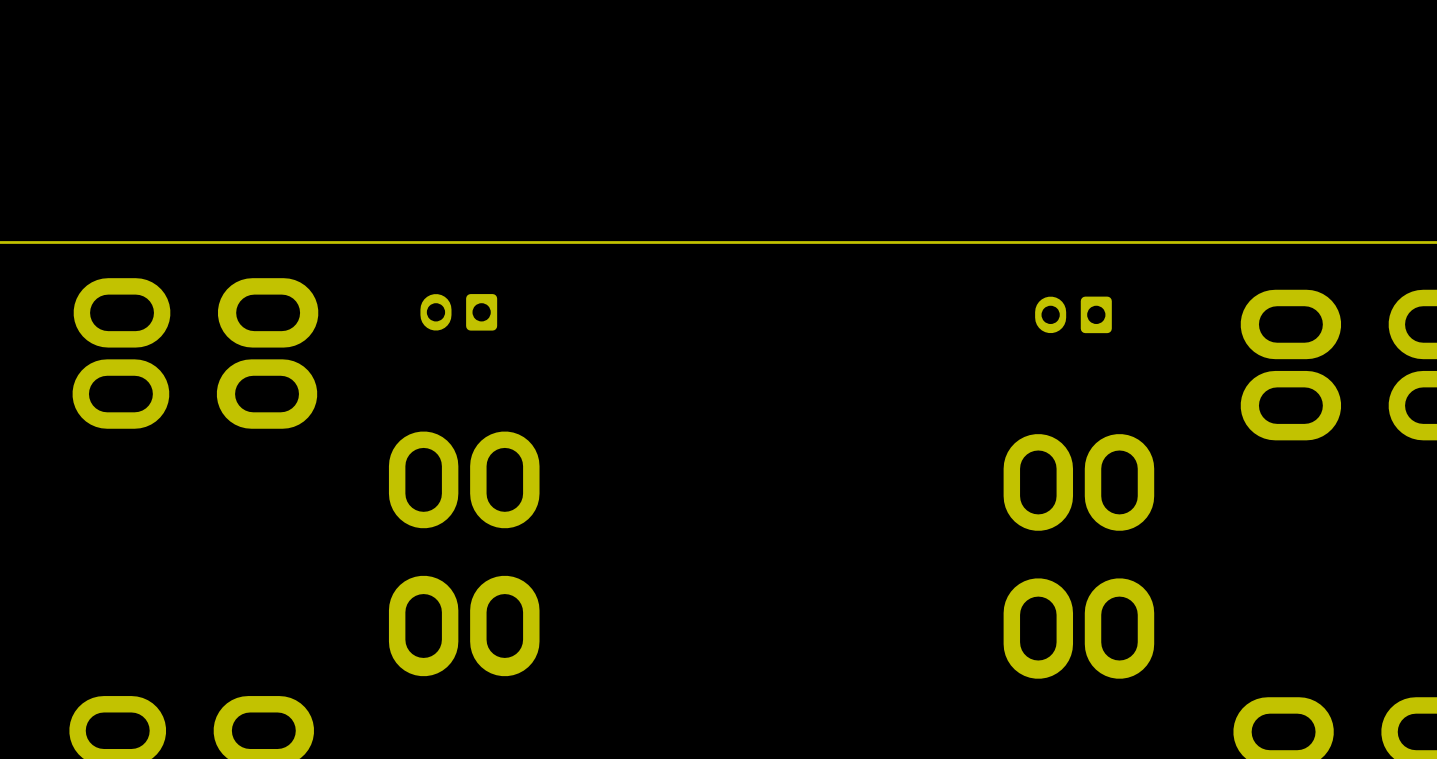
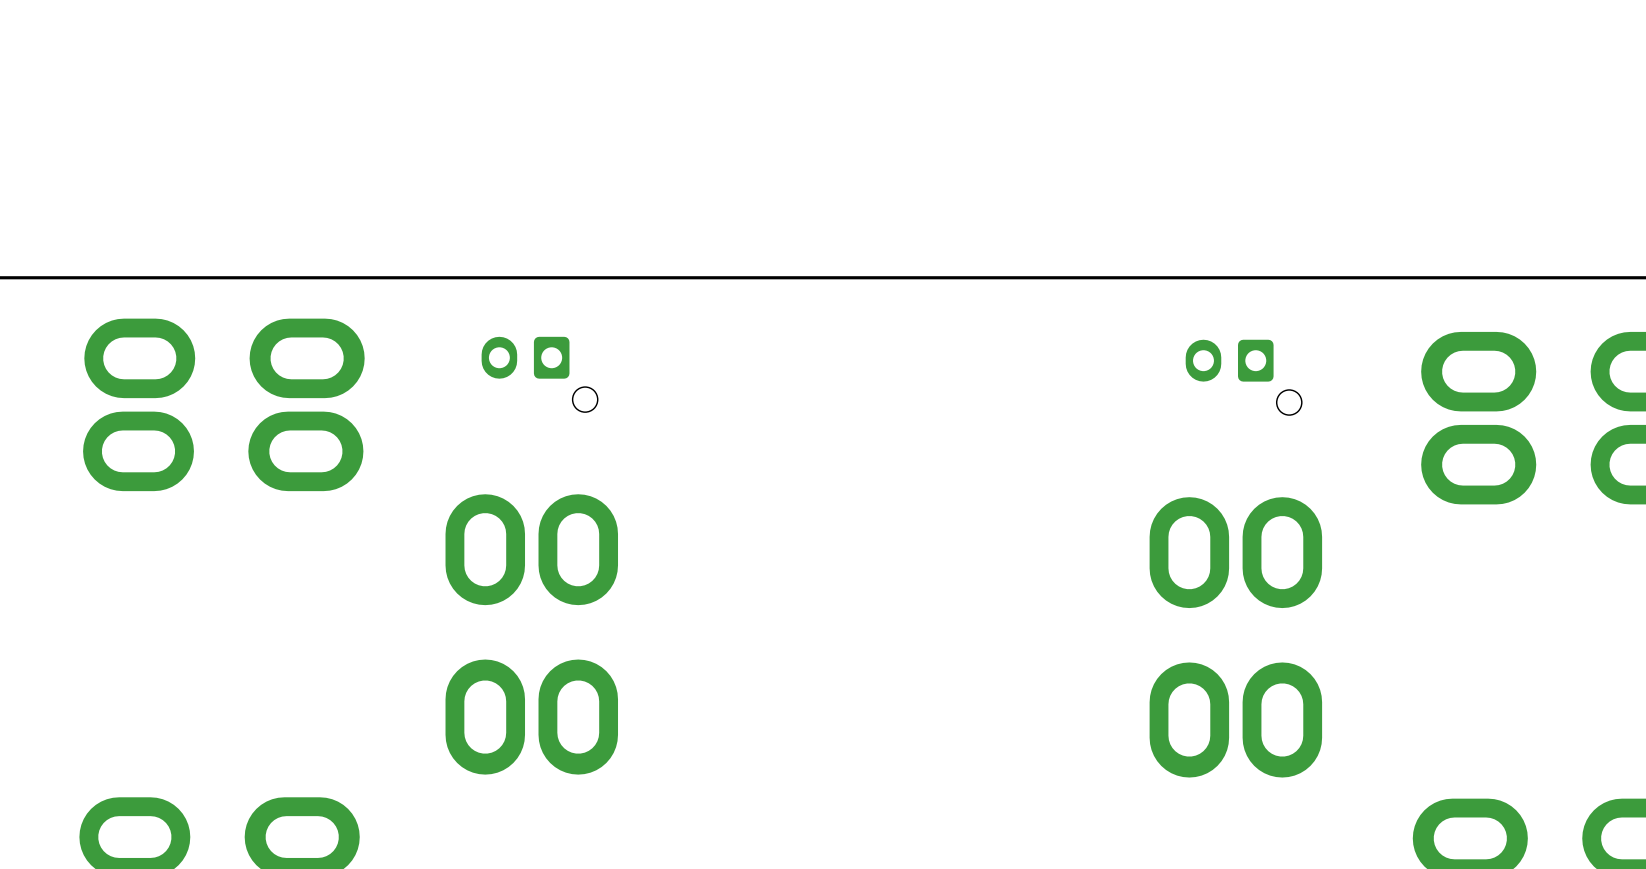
part: none -> (539, 374)
part: none -> (1243, 377)

